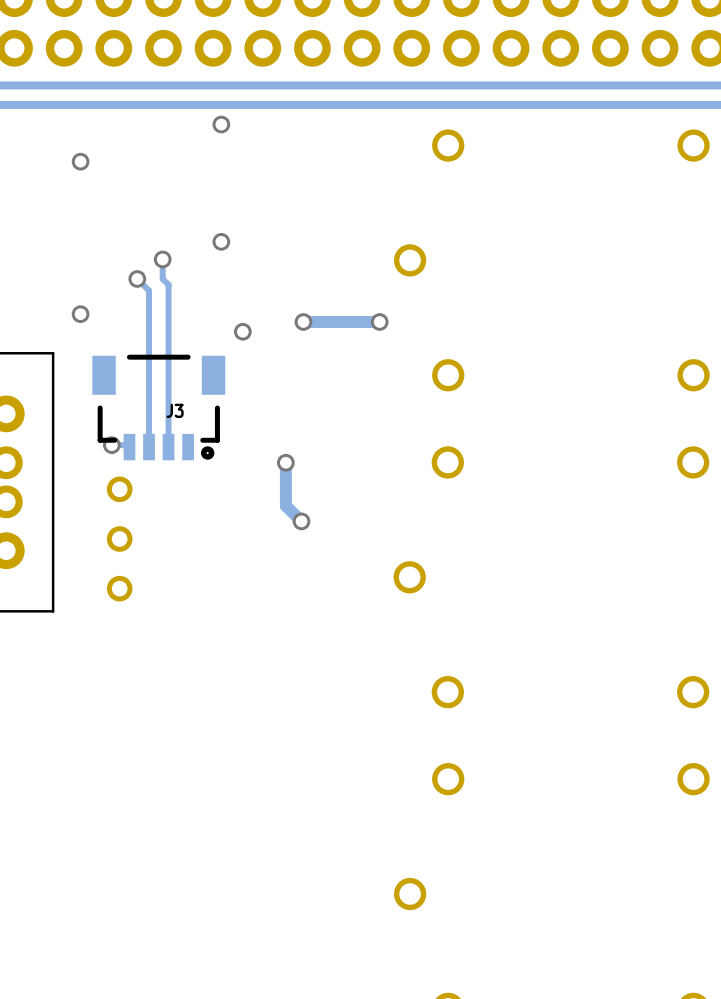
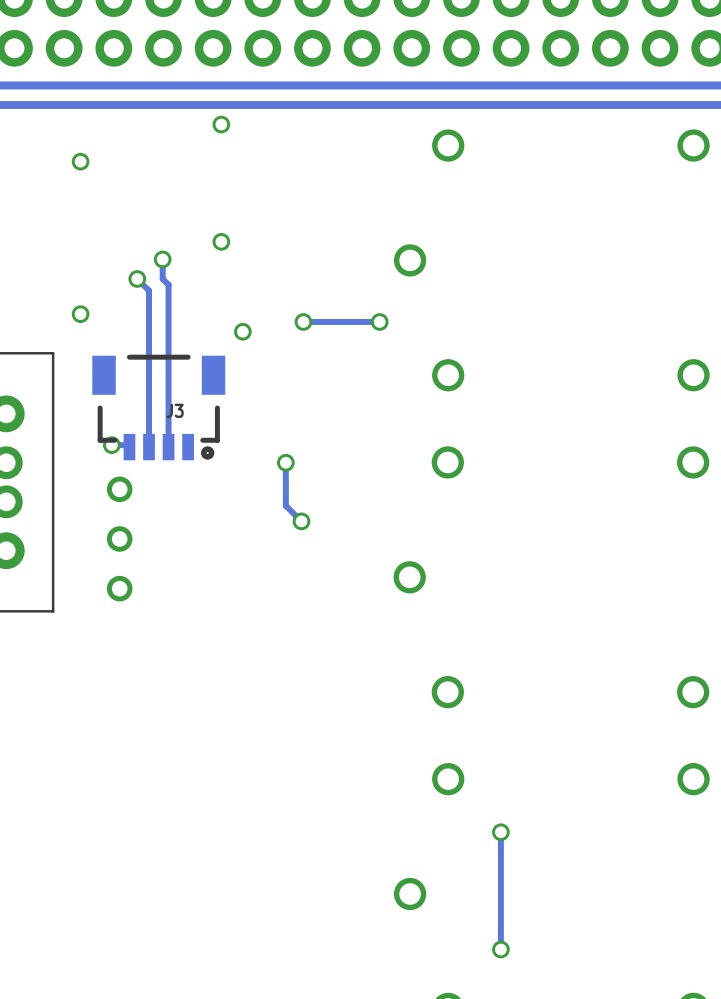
track width: thick (379, 321) (303, 321) -> thin (379, 321) (303, 321)
track width: thick (285, 462) (285, 505) (301, 521) -> thin (285, 462) (285, 505) (301, 521)
track: none -> (500, 832) (500, 949)
via: none -> (500, 832)
via: none -> (500, 949)

